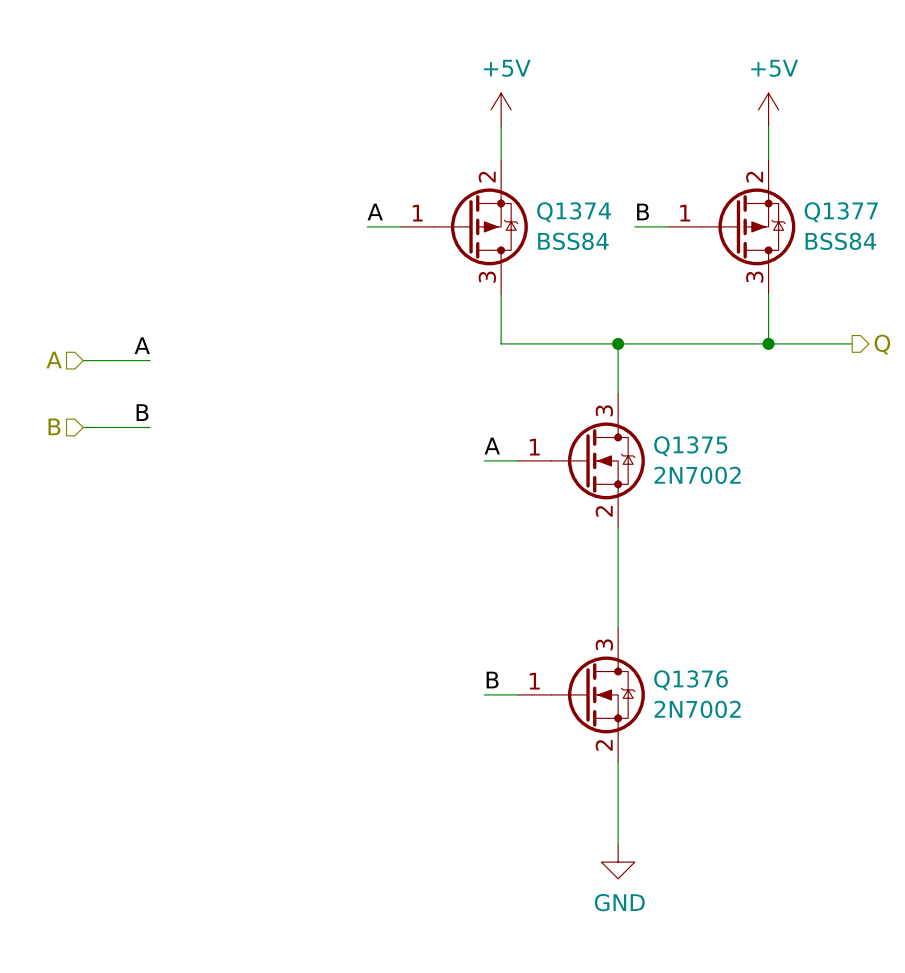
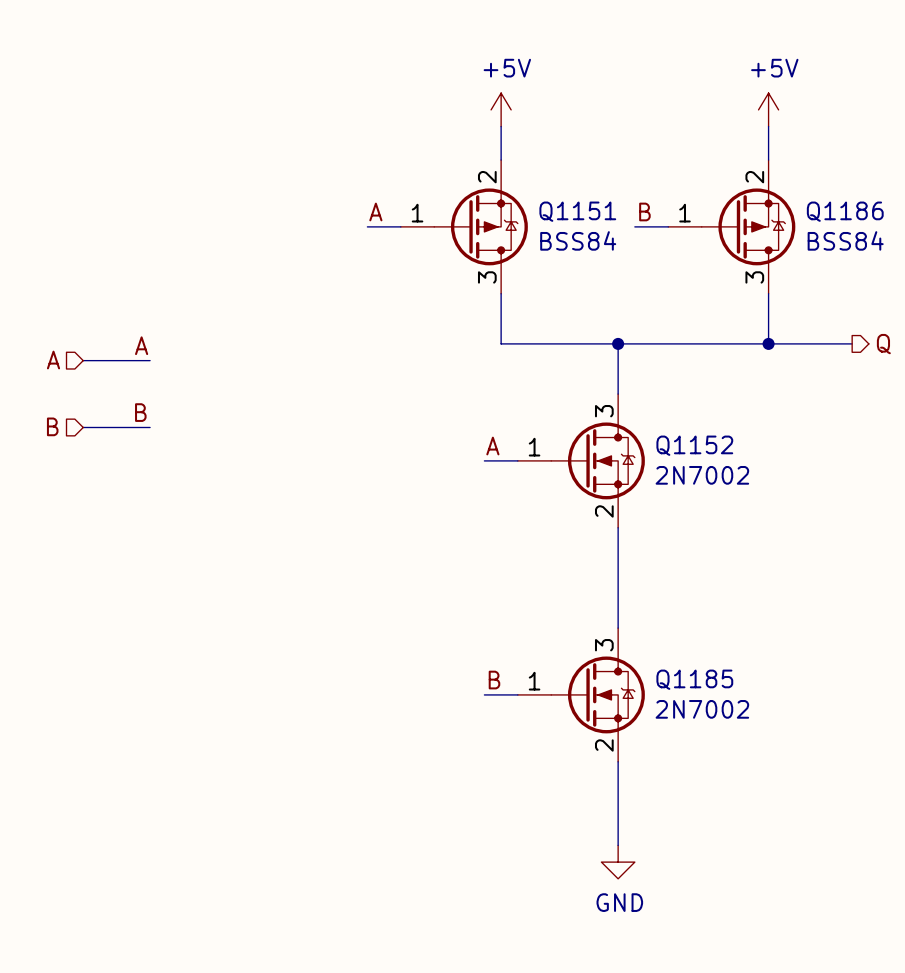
Q1374 name: Q1374 (574, 212) -> Q1151 (577, 211)
Q1377 name: Q1377 (841, 212) -> Q1186 (845, 211)
Q1375 name: Q1375 (690, 446) -> Q1152 (694, 445)
Q1376 name: Q1376 (691, 680) -> Q1185 (694, 679)

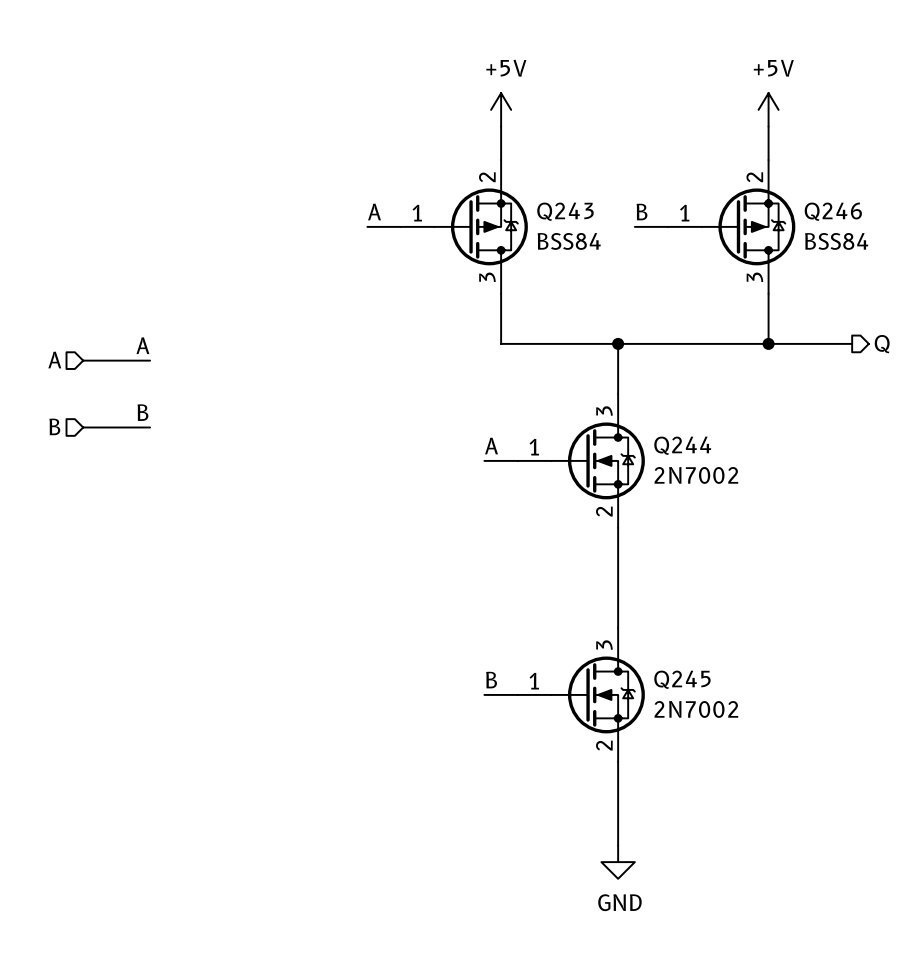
Q1151 name: Q1151 (577, 211) -> Q243 (565, 211)
Q1186 name: Q1186 (845, 211) -> Q246 (833, 211)
Q1152 name: Q1152 (694, 445) -> Q244 (682, 445)
Q1185 name: Q1185 (694, 679) -> Q245 (682, 679)

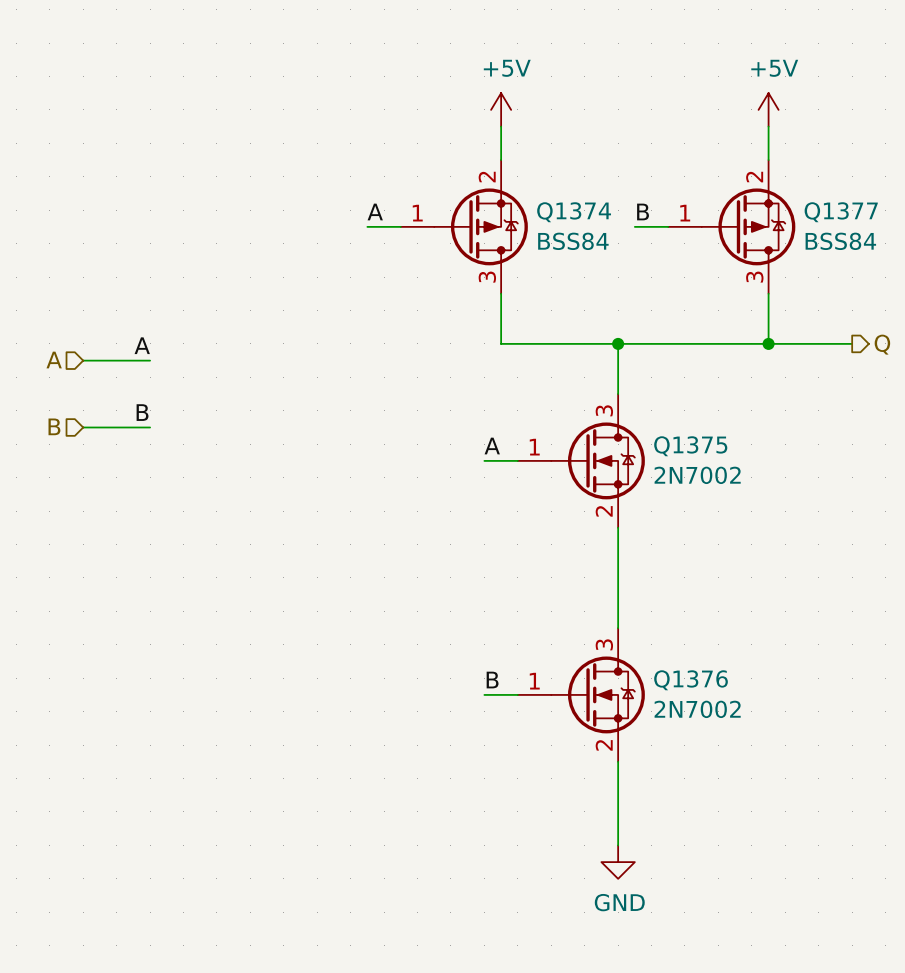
Q243 name: Q243 (565, 211) -> Q1374 (574, 212)
Q246 name: Q246 (833, 211) -> Q1377 (841, 212)
Q244 name: Q244 (682, 445) -> Q1375 (690, 446)
Q245 name: Q245 (682, 679) -> Q1376 (691, 680)

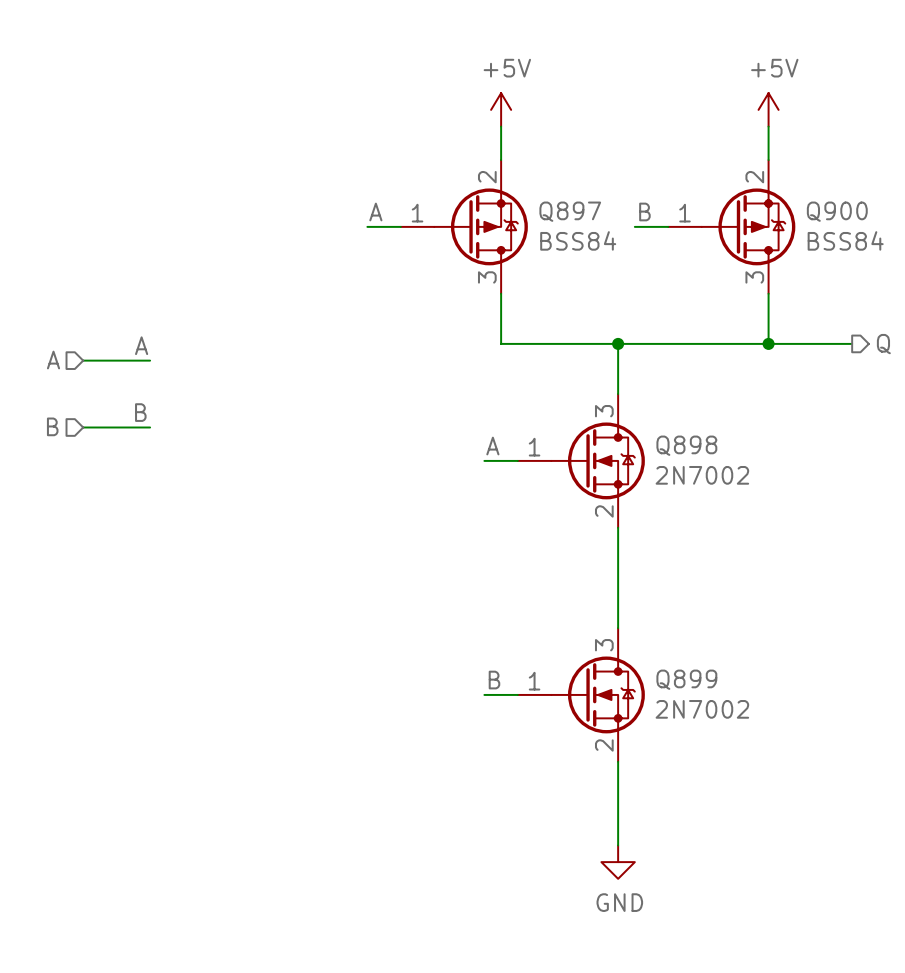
Q1374 name: Q1374 (574, 212) -> Q897 (570, 211)
Q1377 name: Q1377 (841, 212) -> Q900 (837, 211)
Q1375 name: Q1375 (690, 446) -> Q898 (686, 445)
Q1376 name: Q1376 (691, 680) -> Q899 (686, 679)

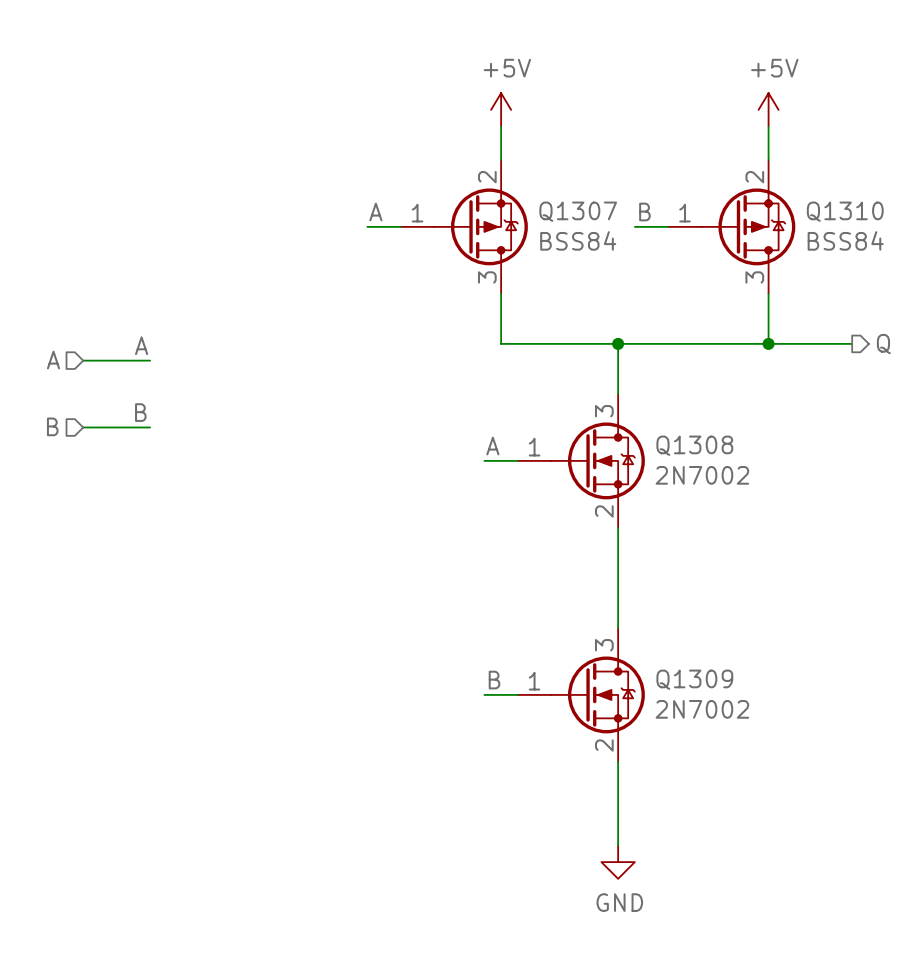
Q897 name: Q897 (570, 211) -> Q1307 (578, 211)
Q900 name: Q900 (837, 211) -> Q1310 (845, 211)
Q898 name: Q898 (686, 445) -> Q1308 (694, 445)
Q899 name: Q899 (686, 679) -> Q1309 (694, 679)

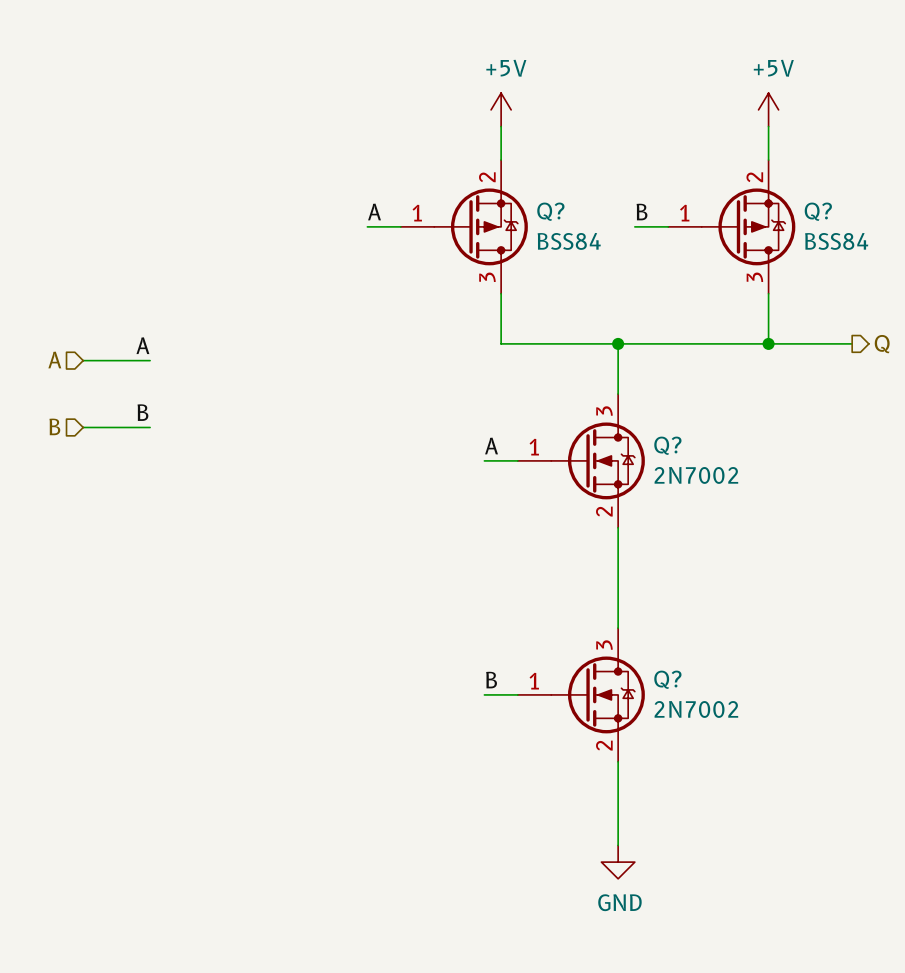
Q1307 name: Q1307 (578, 211) -> Q? (550, 211)
Q1310 name: Q1310 (845, 211) -> Q? (818, 211)
Q1308 name: Q1308 (694, 445) -> Q? (667, 445)
Q1309 name: Q1309 (694, 679) -> Q? (667, 679)

